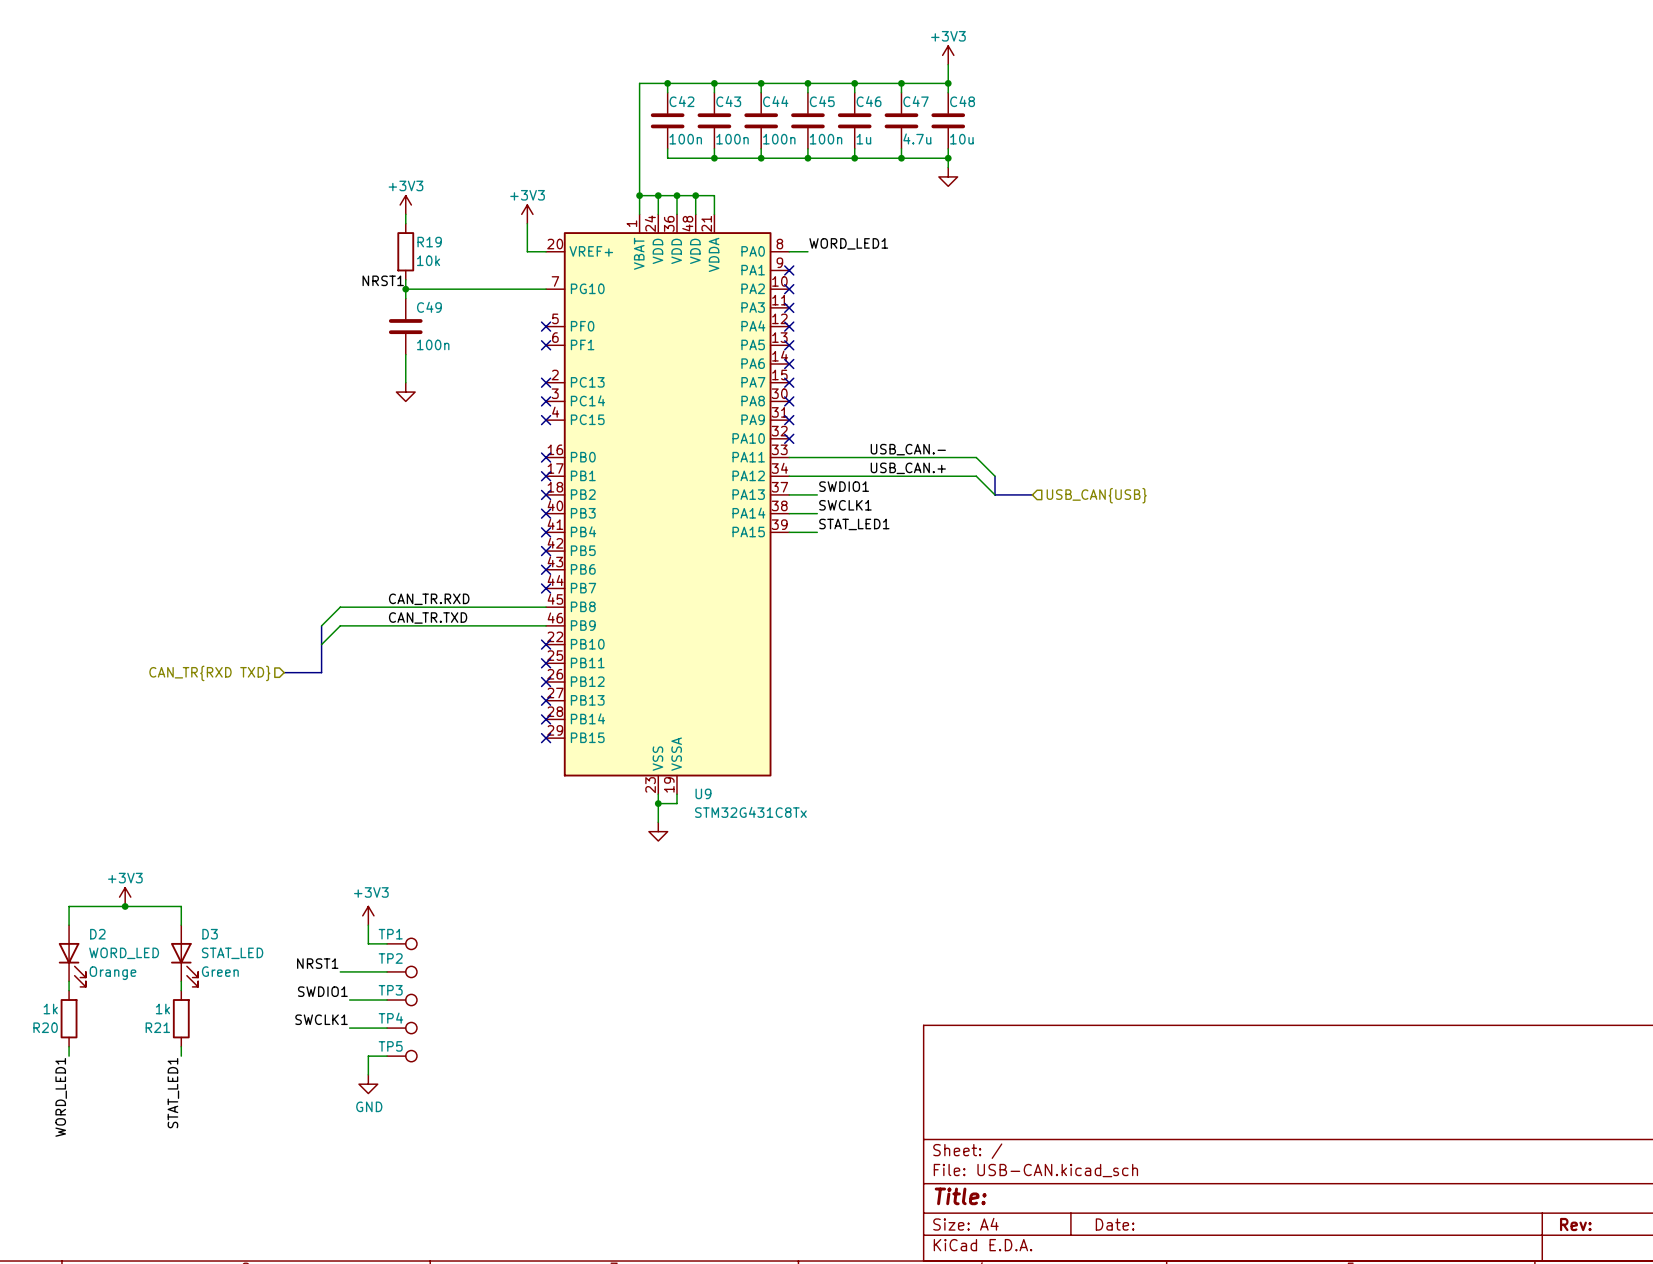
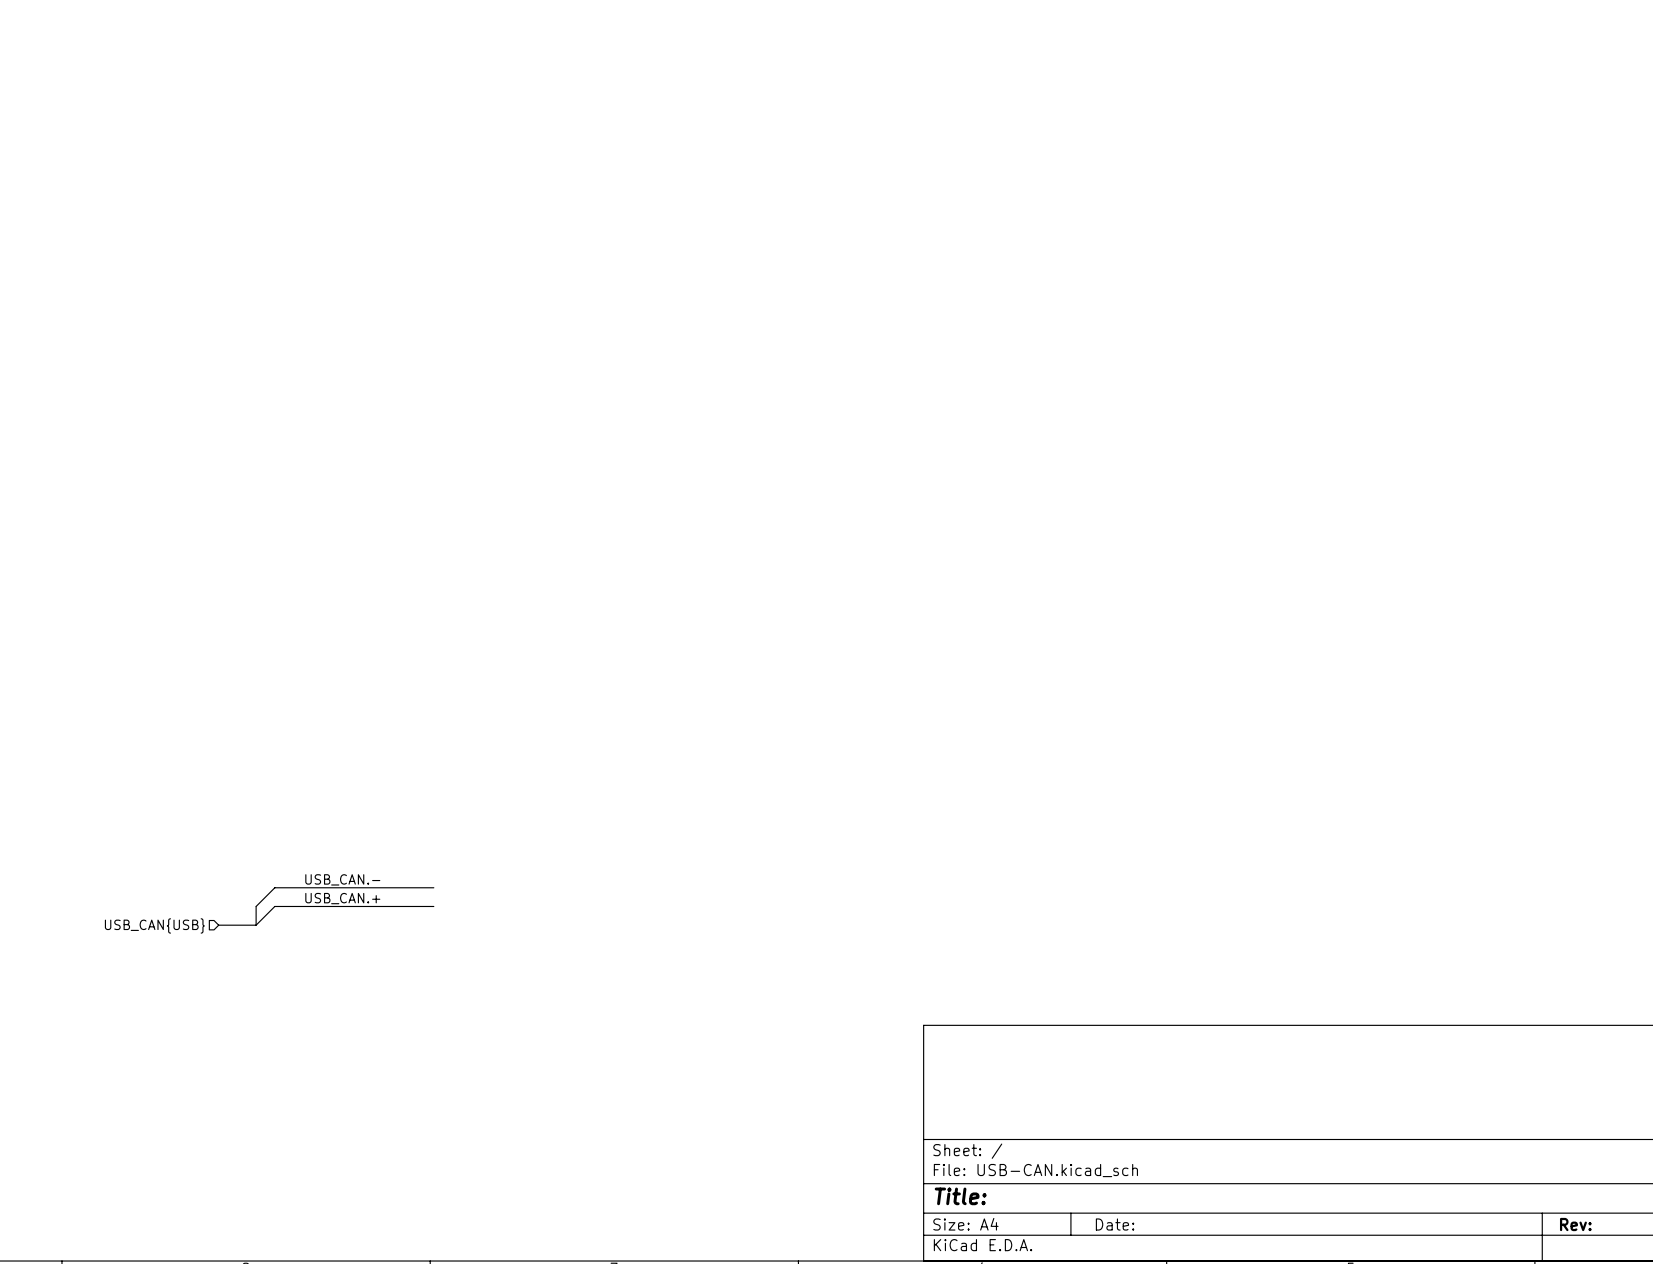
power symbol: +3V3 (948, 55) -> none
wire: (948, 64) (948, 92) -> none
wire: (667, 83) (667, 92) -> none
junction: (667, 83) -> none
wire: (714, 83) (714, 92) -> none
junction: (714, 83) -> none
wire: (761, 83) (761, 92) -> none
junction: (761, 83) -> none
wire: (807, 83) (807, 92) -> none
junction: (807, 83) -> none
wire: (854, 83) (854, 92) -> none
junction: (854, 83) -> none
wire: (901, 83) (901, 92) -> none
junction: (901, 83) -> none
wire: (948, 83) (639, 83) (639, 214) -> none
junction: (948, 83) -> none
C42: 100n (667, 120) -> none
C43: 100n (714, 120) -> none
C44: 100n (761, 120) -> none
C45: 100n (807, 120) -> none
C46: 1u (854, 120) -> none
C47: 4.7u (901, 120) -> none
C48: 10u (948, 120) -> none
wire: (667, 148) (667, 158) (948, 158) -> none
wire: (714, 148) (714, 158) -> none
wire: (761, 148) (761, 158) -> none
wire: (807, 148) (807, 158) -> none
wire: (854, 148) (854, 158) -> none
wire: (901, 148) (901, 158) -> none
wire: (948, 148) (948, 167) -> none
junction: (714, 158) -> none
junction: (761, 158) -> none
junction: (807, 158) -> none
junction: (854, 158) -> none
junction: (901, 158) -> none
junction: (948, 158) -> none
power symbol: (948, 176) -> none
wire: (639, 195) (714, 195) (714, 214) -> none
junction: (639, 195) -> none
wire: (658, 195) (658, 214) -> none
junction: (658, 195) -> none
wire: (677, 195) (677, 214) -> none
junction: (677, 195) -> none
wire: (695, 195) (695, 214) -> none
junction: (695, 195) -> none
power symbol: +3V3 (405, 205) -> none
wire: (405, 214) (405, 223) -> none
power symbol: +3V3 (527, 214) -> none
wire: (527, 223) (527, 251) (546, 251) -> none
label: WORD_LED1 (848, 243) -> none
R19: 10k (405, 251) -> none
wire: (789, 251) (807, 251) -> none
no-connect mark: (789, 270) -> none
wire: (405, 279) (405, 298) -> none
label: NRST1 (383, 280) -> none
wire: (405, 289) (546, 289) -> none
junction: (405, 289) -> none
no-connect mark: (789, 289) -> none
no-connect mark: (789, 307) -> none
C49: 100n (405, 326) -> none
no-connect mark: (546, 326) -> none
no-connect mark: (789, 326) -> none
no-connect mark: (546, 345) -> none
no-connect mark: (789, 345) -> none
wire: (405, 354) (405, 382) -> none
no-connect mark: (789, 364) -> none
no-connect mark: (546, 382) -> none
no-connect mark: (789, 382) -> none
power symbol: (405, 392) -> none
no-connect mark: (546, 401) -> none
no-connect mark: (789, 401) -> none
no-connect mark: (546, 420) -> none
no-connect mark: (789, 420) -> none
no-connect mark: (789, 438) -> none
label: USB_CAN.- (908, 449) -> none
no-connect mark: (546, 457) -> none
wire: (789, 457) (976, 457) (995, 476) -> none
label: USB_CAN.+ (908, 468) -> none
no-connect mark: (546, 476) -> none
wire: (789, 476) (976, 476) (995, 494) -> none
bus: (995, 476) (995, 494) (1032, 494) -> none
label: SWDIO1 (844, 486) -> none
no-connect mark: (546, 494) -> none
wire: (789, 494) (817, 494) -> none
hierarchical label: USB_CAN{USB} (1096, 495) -> none
U9: STM32G431C8Tx (667, 504) -> none
label: SWCLK1 (845, 505) -> none
no-connect mark: (546, 513) -> none
wire: (789, 513) (817, 513) -> none
label: STAT_LED1 (854, 524) -> none
no-connect mark: (546, 532) -> none
wire: (789, 532) (817, 532) -> none
no-connect mark: (546, 551) -> none
no-connect mark: (546, 569) -> none
no-connect mark: (546, 588) -> none
label: CAN_TR.RXD (429, 599) -> none
wire: (546, 607) (340, 607) (321, 625) -> none
label: CAN_TR.TXD (428, 617) -> none
bus: (321, 625) (321, 672) (284, 672) -> none
wire: (546, 625) (340, 625) (321, 644) -> none
no-connect mark: (546, 644) -> none
no-connect mark: (546, 663) -> none
hierarchical label: CAN_TR{RXD TXD} (209, 673) -> none
no-connect mark: (546, 682) -> none
no-connect mark: (546, 700) -> none
no-connect mark: (546, 719) -> none
no-connect mark: (546, 738) -> none
wire: (658, 794) (658, 822) -> none
wire: (677, 794) (677, 803) (658, 803) -> none
junction: (658, 803) -> none
power symbol: (658, 831) -> none
label: none -> USB_CAN.- (342, 879)
wire: none -> (433, 887) (274, 887) (256, 906)
power symbol: +3V3 (125, 897) -> none
label: none -> USB_CAN.+ (342, 898)
junction: (125, 906) -> none
bus: none -> (256, 906) (256, 925) (218, 925)
wire: none -> (433, 906) (274, 906) (256, 925)
power symbol: +3V3 (368, 915) -> none
wire: (69, 925) (69, 906) (181, 906) (181, 925) -> none
hierarchical label: none -> USB_CAN{USB} (154, 925)
wire: (368, 925) (368, 943) (387, 943) -> none
TP1: (402, 943) -> none
D2: WORD_LED (72, 956) -> none
D3: STAT_LED (184, 956) -> none
label: NRST1 (317, 963) -> none
wire: (340, 971) (387, 971) -> none
TP2: (402, 971) -> none
wire: (69, 981) (69, 990) -> none
wire: (181, 981) (181, 990) -> none
label: SWDIO1 (322, 991) -> none
wire: (349, 1000) (387, 1000) -> none
TP3: (402, 1000) -> none
R20: 1k (69, 1018) -> none
R21: 1k (181, 1018) -> none
label: SWCLK1 (321, 1019) -> none
wire: (349, 1028) (387, 1028) -> none
TP4: (402, 1028) -> none
wire: (69, 1046) (69, 1056) -> none
wire: (181, 1046) (181, 1056) -> none
wire: (387, 1056) (368, 1056) (368, 1074) -> none
TP5: (402, 1056) -> none
power symbol: GND (368, 1084) -> none
label: STAT_LED1 (173, 1093) -> none
label: WORD_LED1 (61, 1097) -> none

